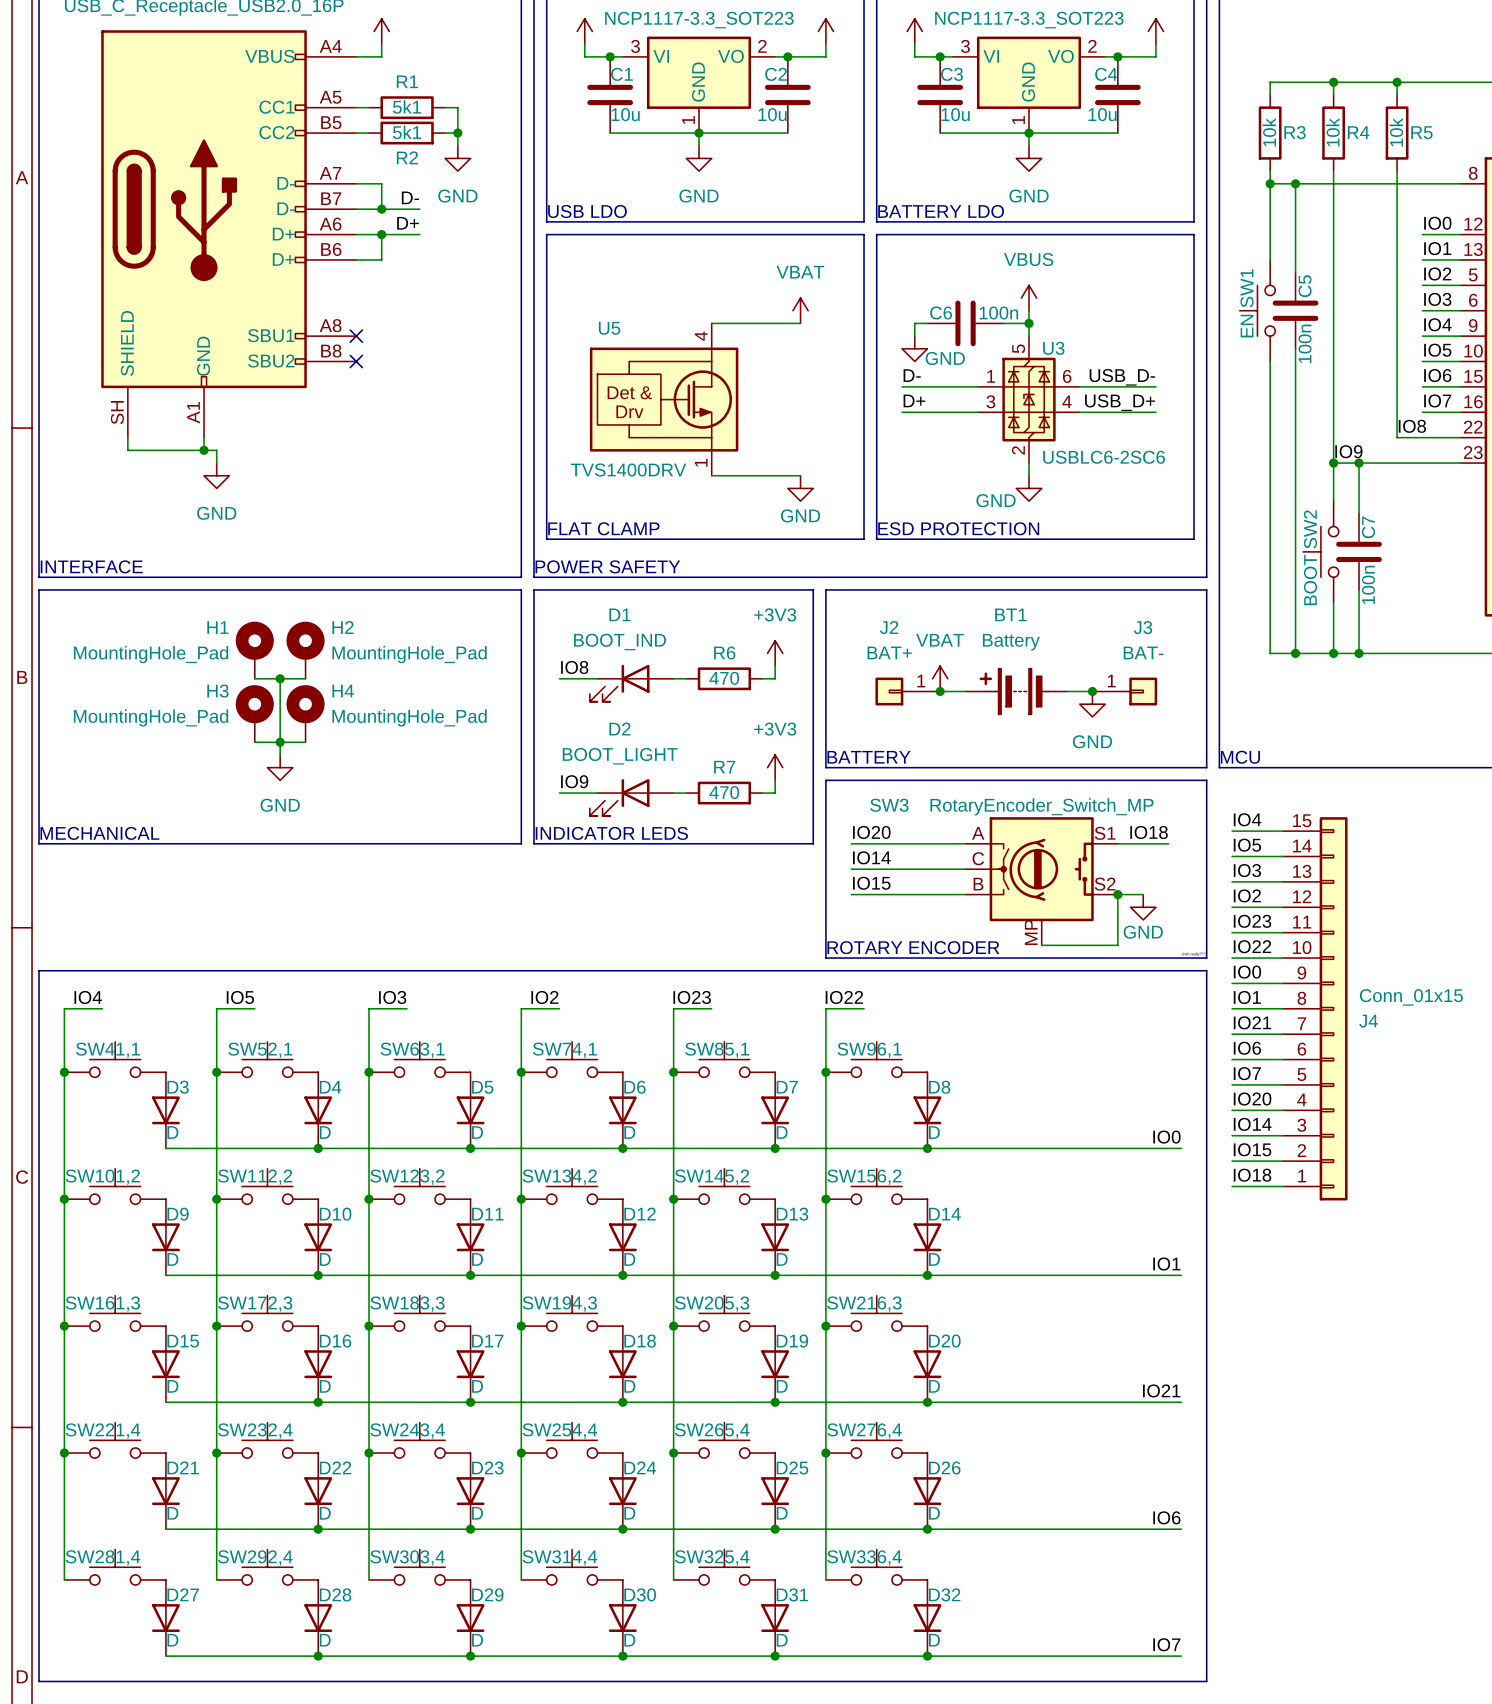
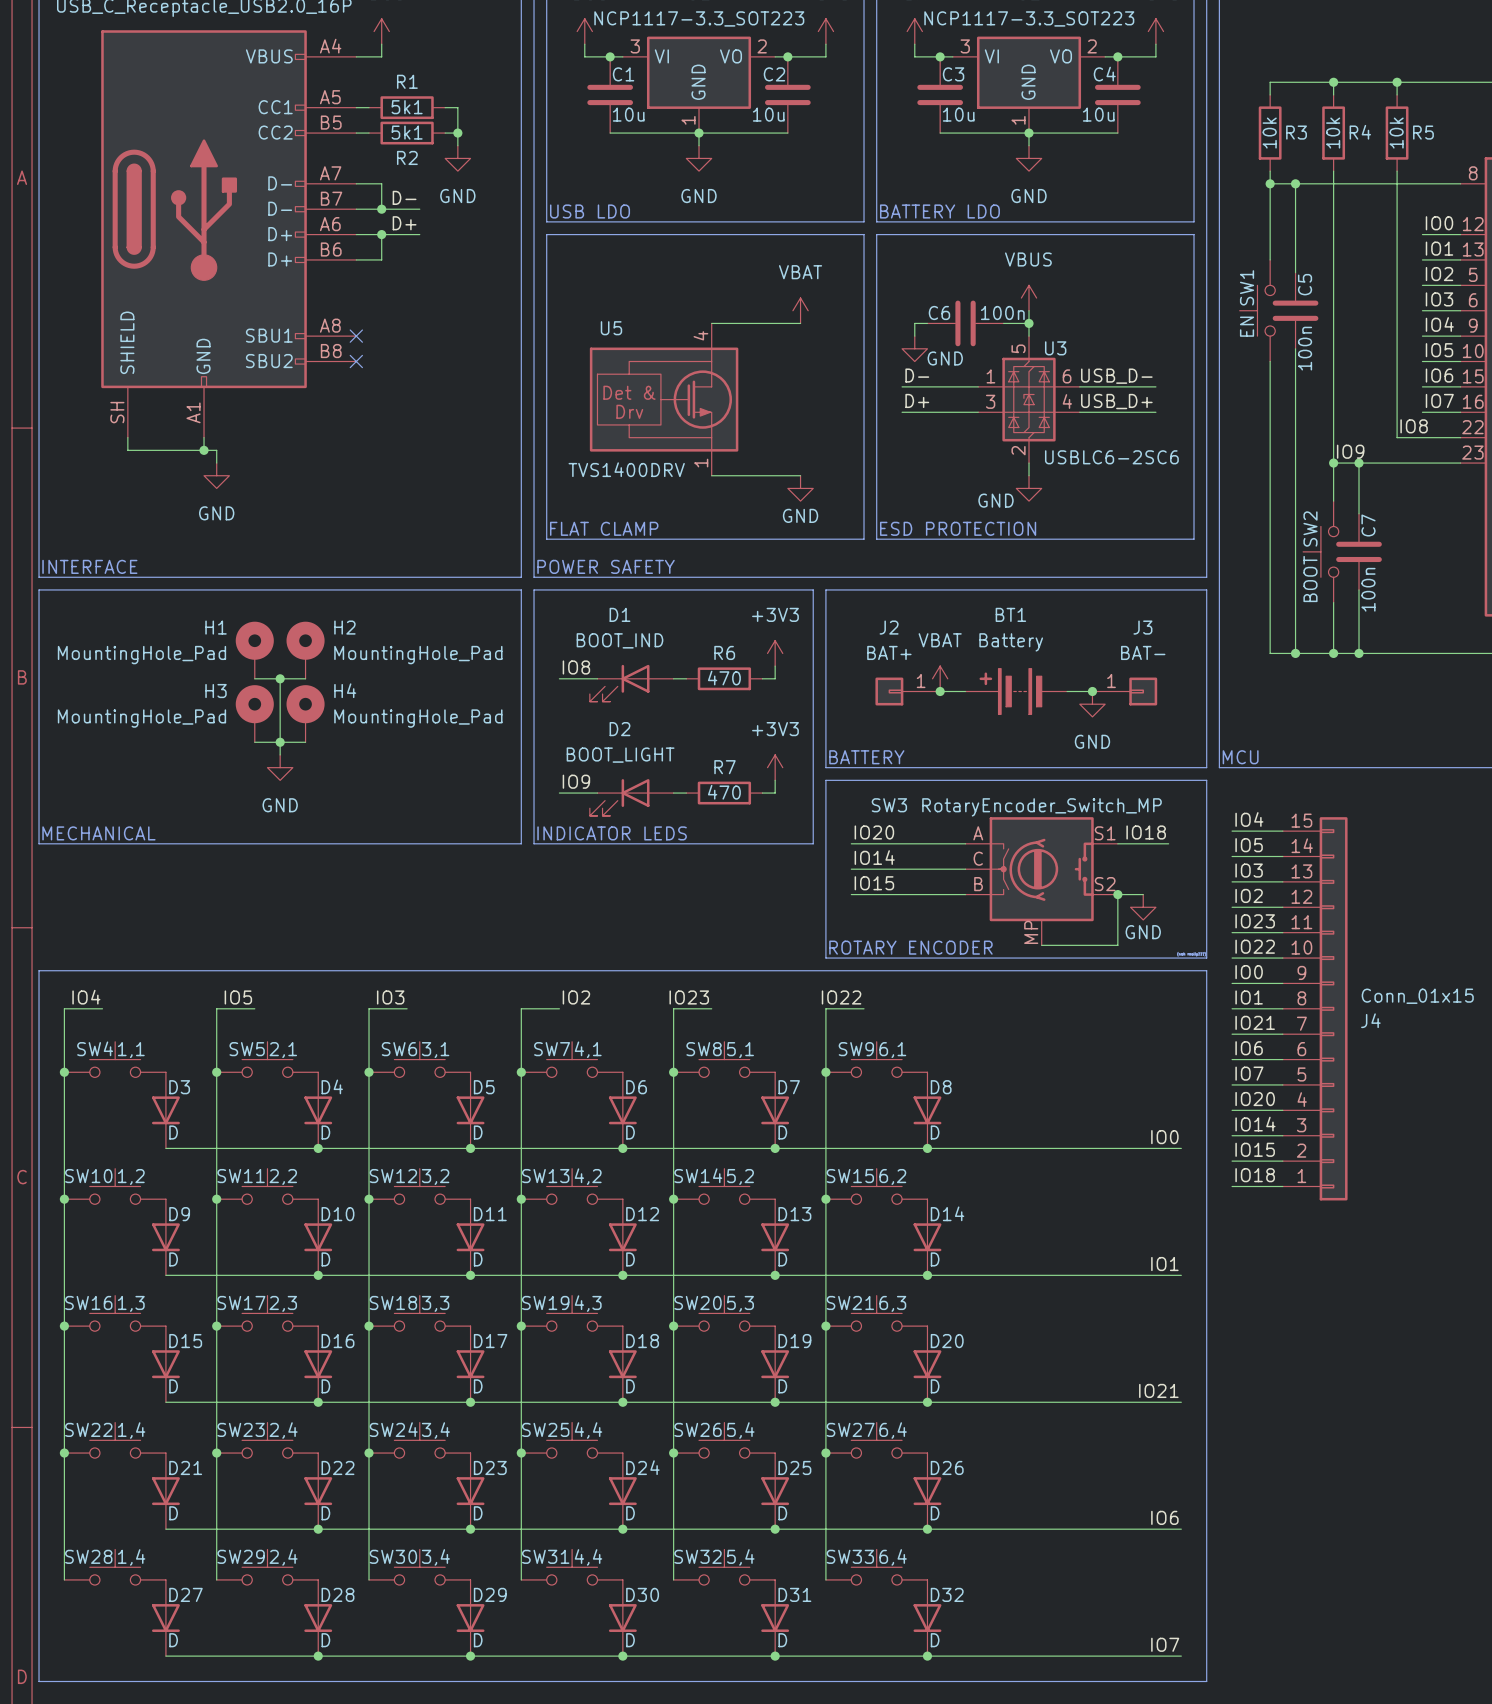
label position: IO2 (544, 997) -> IO2 (576, 997)

